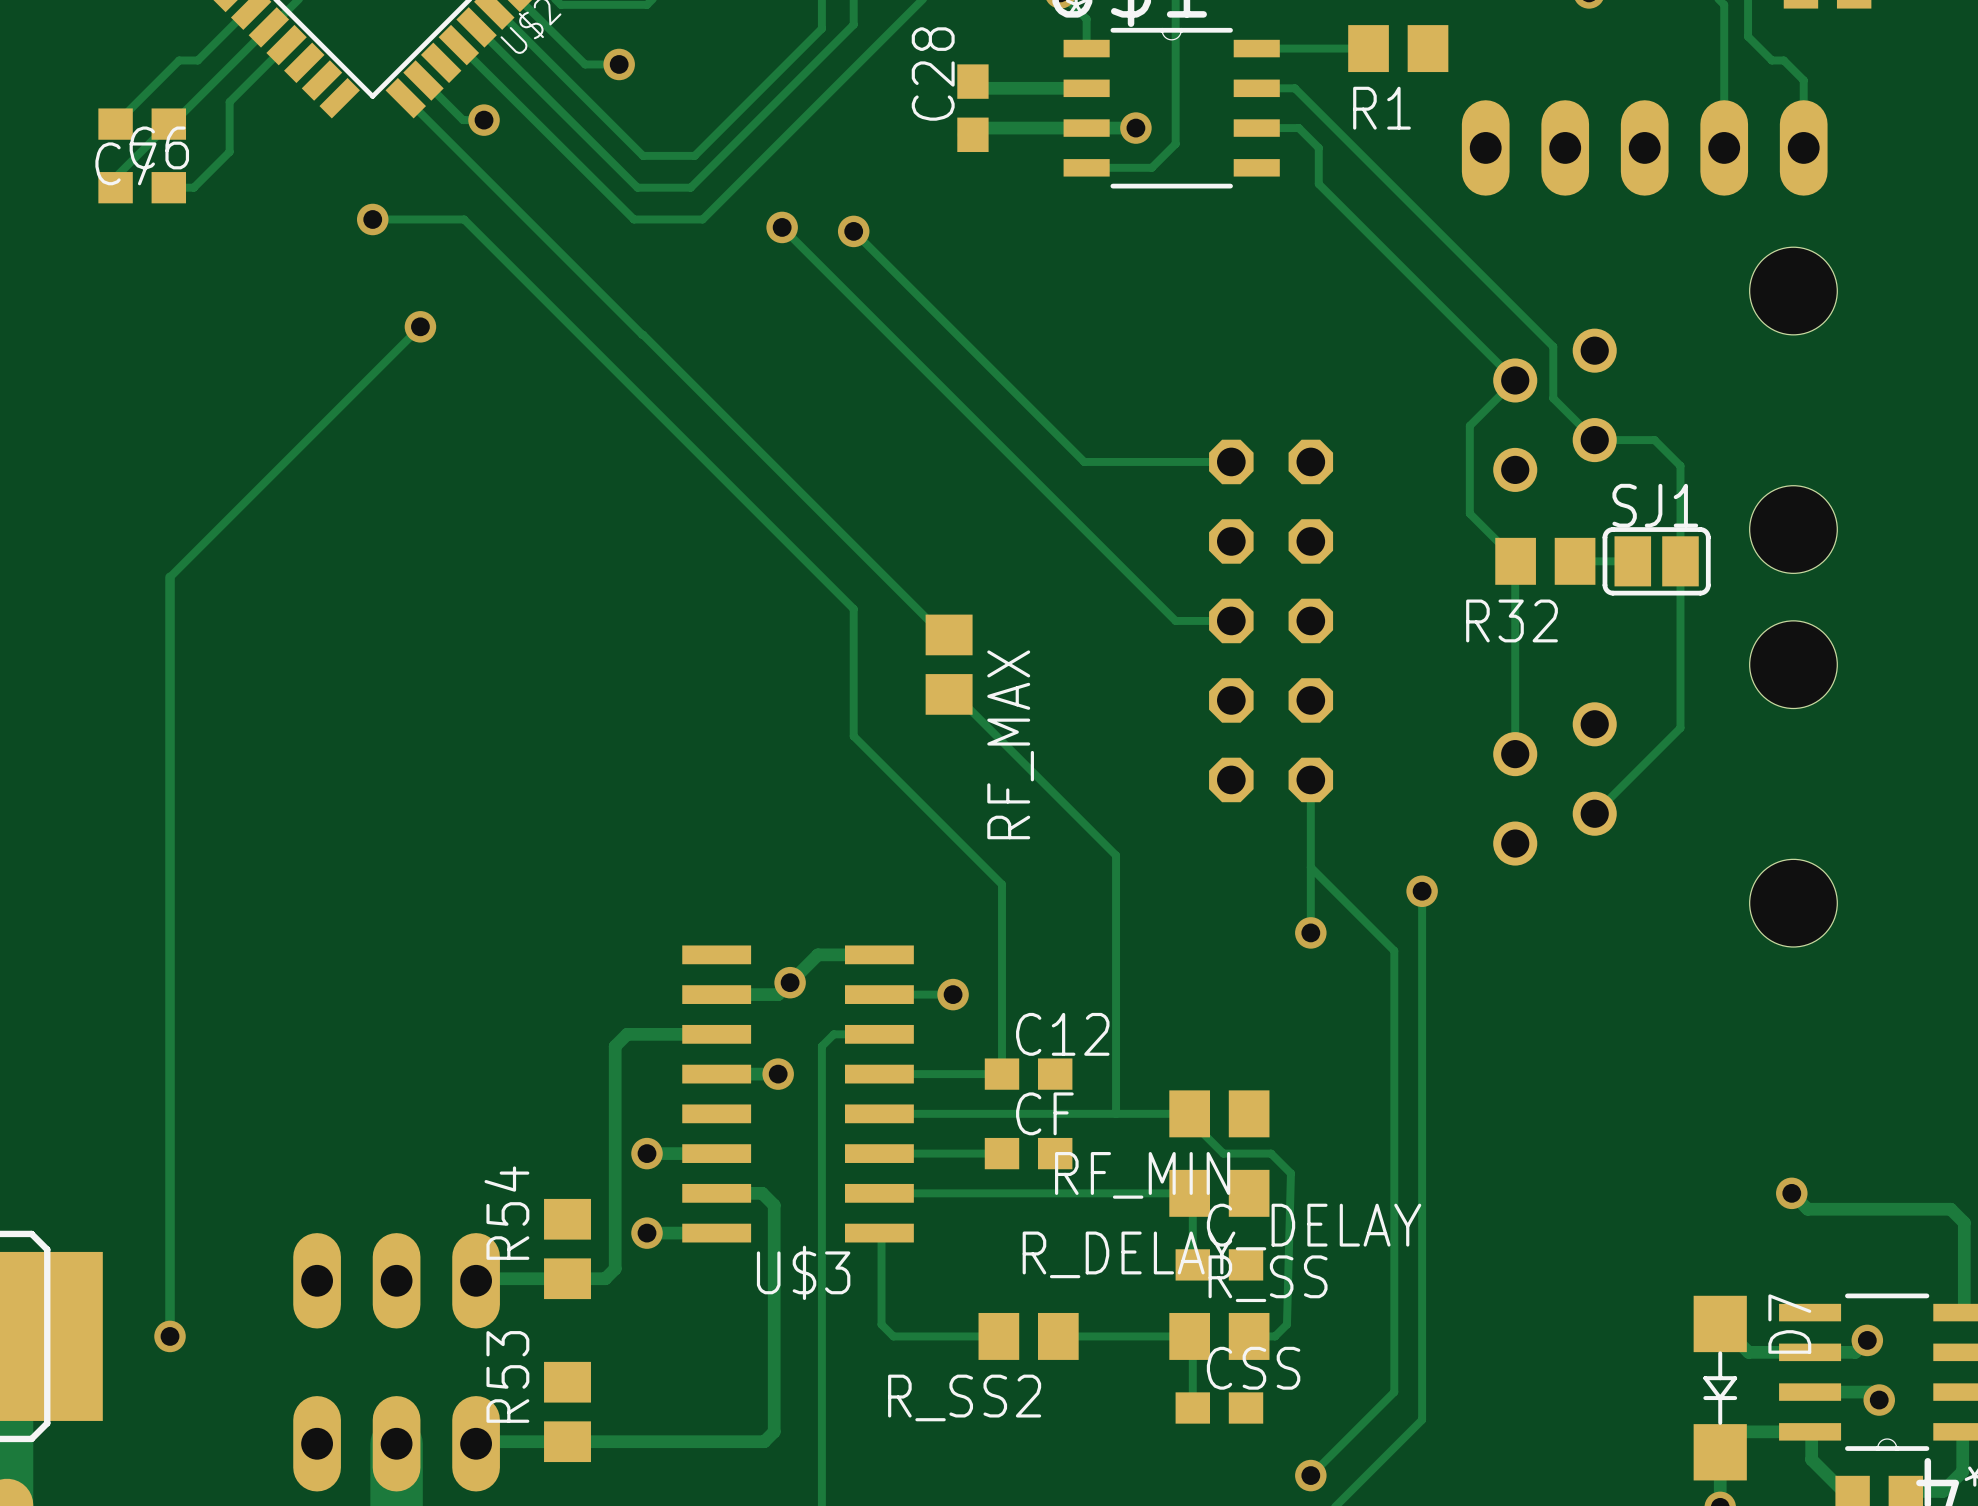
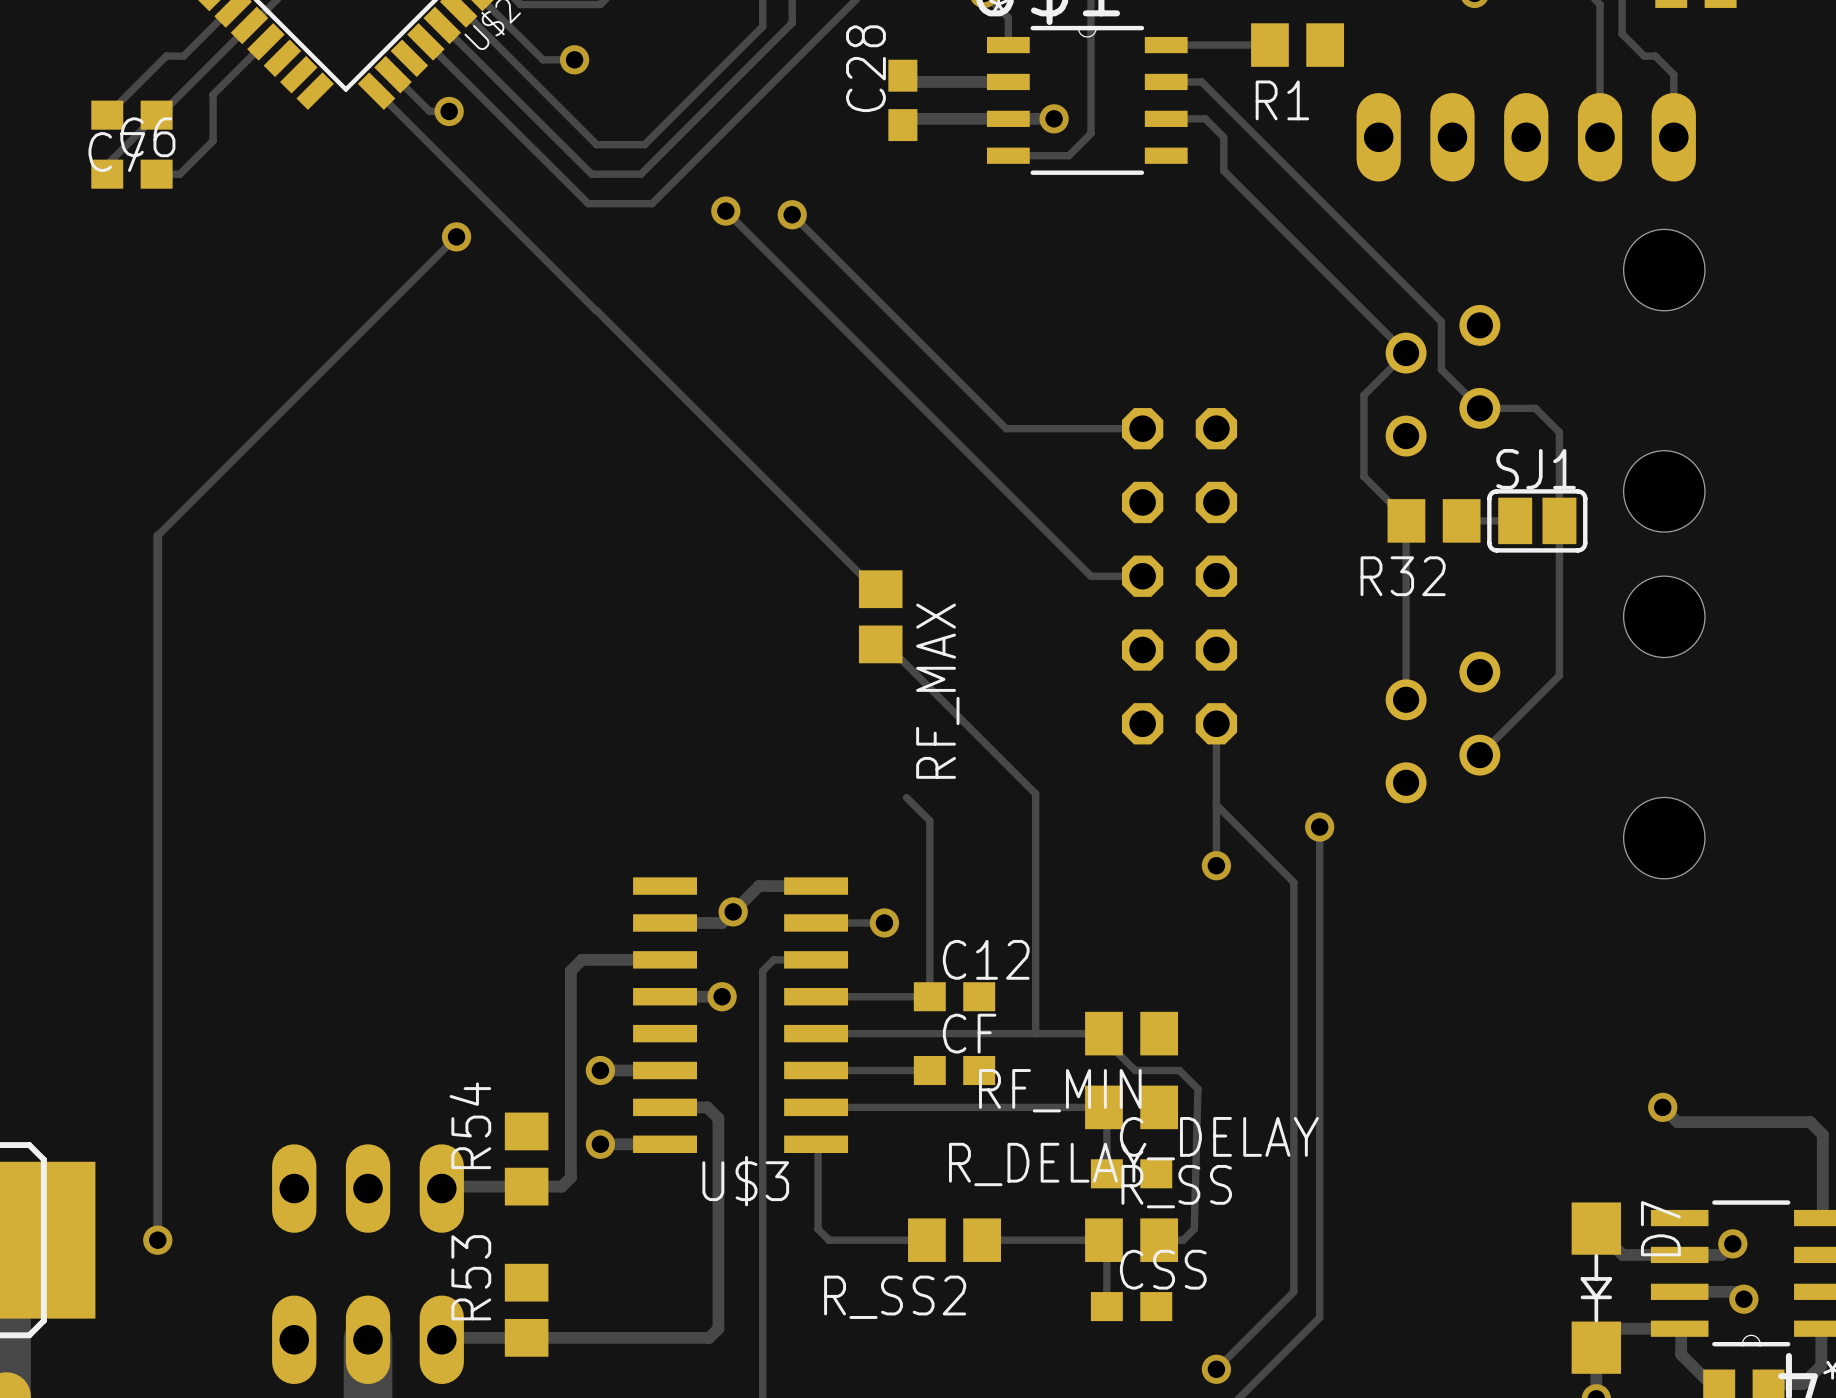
track: (372, 219) (464, 219) (853, 609) (853, 736) (976, 859) -> none
via: (372, 219) -> none
track: none -> (456, 236) (390, 303)
via: none -> (456, 236)
via: (420, 326) -> none

